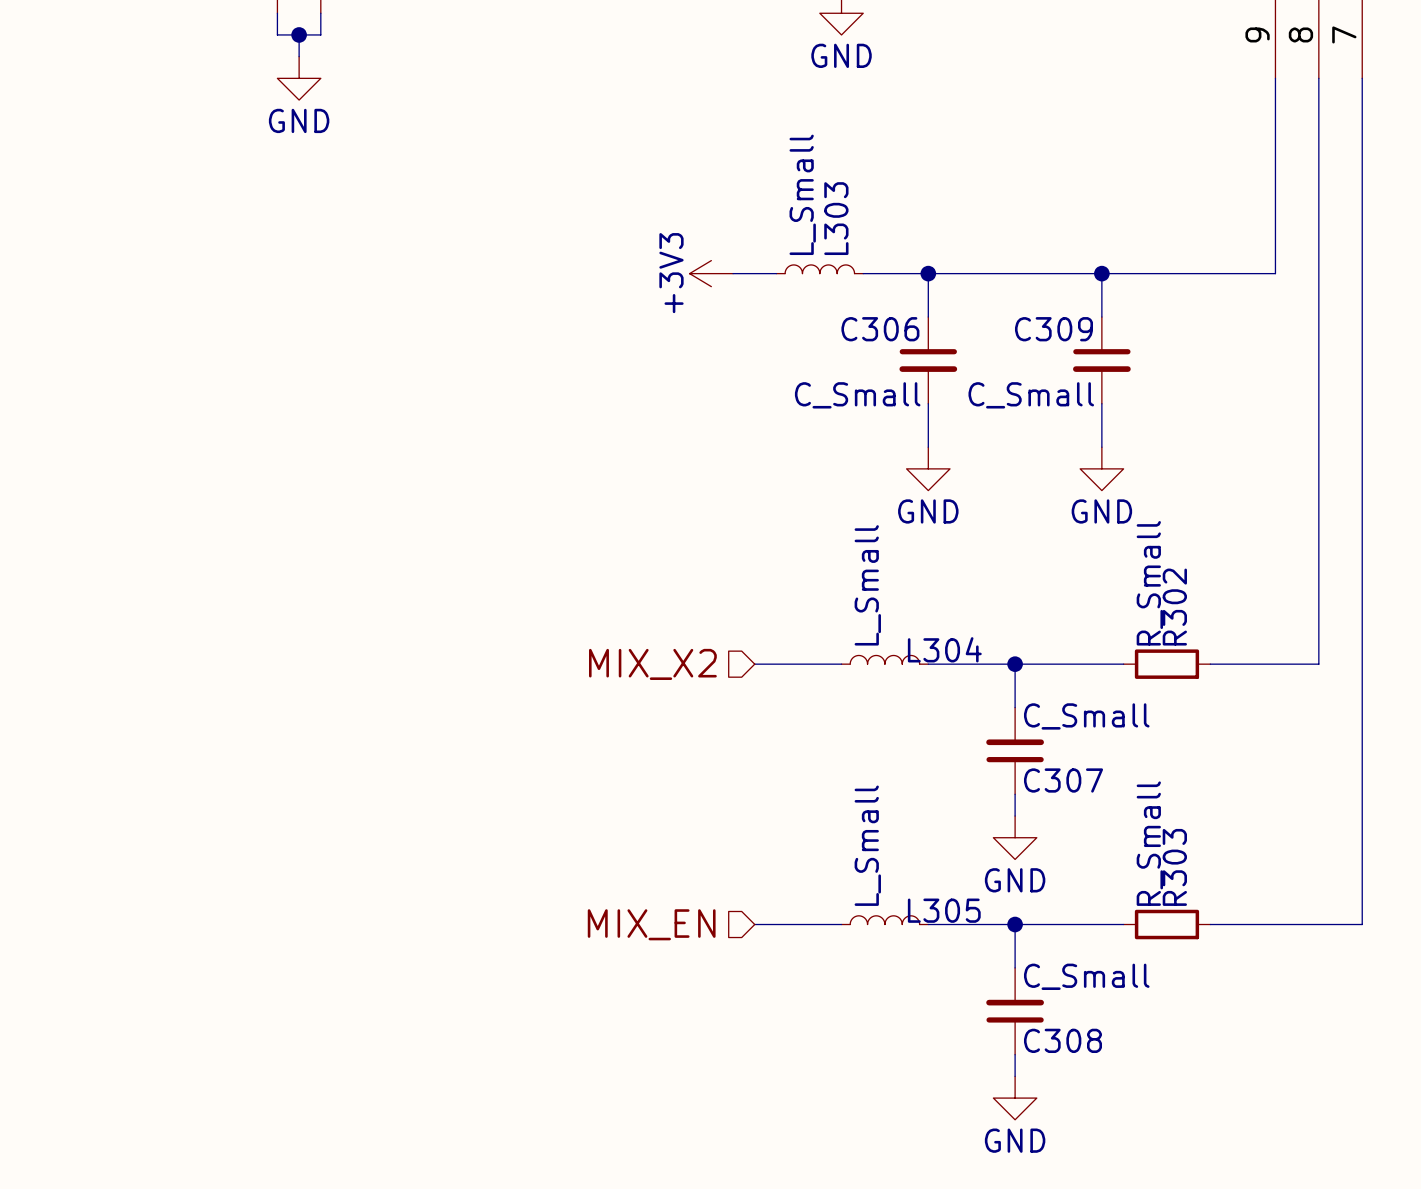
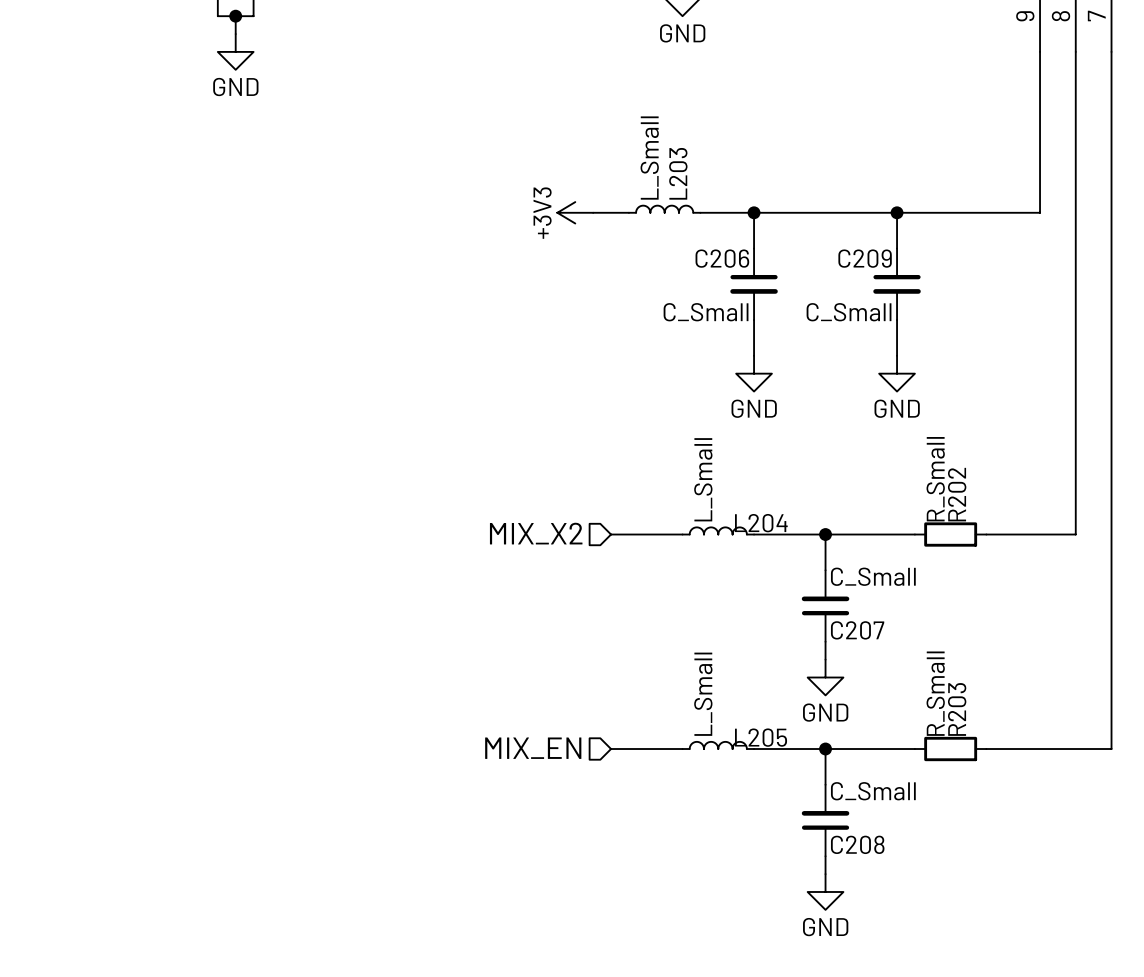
L303 name: L303 (836, 218) -> L203 (678, 173)
C306 name: C306 (880, 329) -> C206 (722, 258)
C309 name: C309 (1053, 329) -> C209 (865, 258)
R302 name: R302 (1174, 607) -> R202 (957, 494)
L304 name: L304 (944, 649) -> L204 (761, 523)
C307 name: C307 (1063, 780) -> C207 (857, 630)
R303 name: R303 (1174, 867) -> R203 (957, 709)
L305 name: L305 (944, 910) -> L205 (761, 737)
C308 name: C308 (1062, 1040) -> C208 (857, 844)

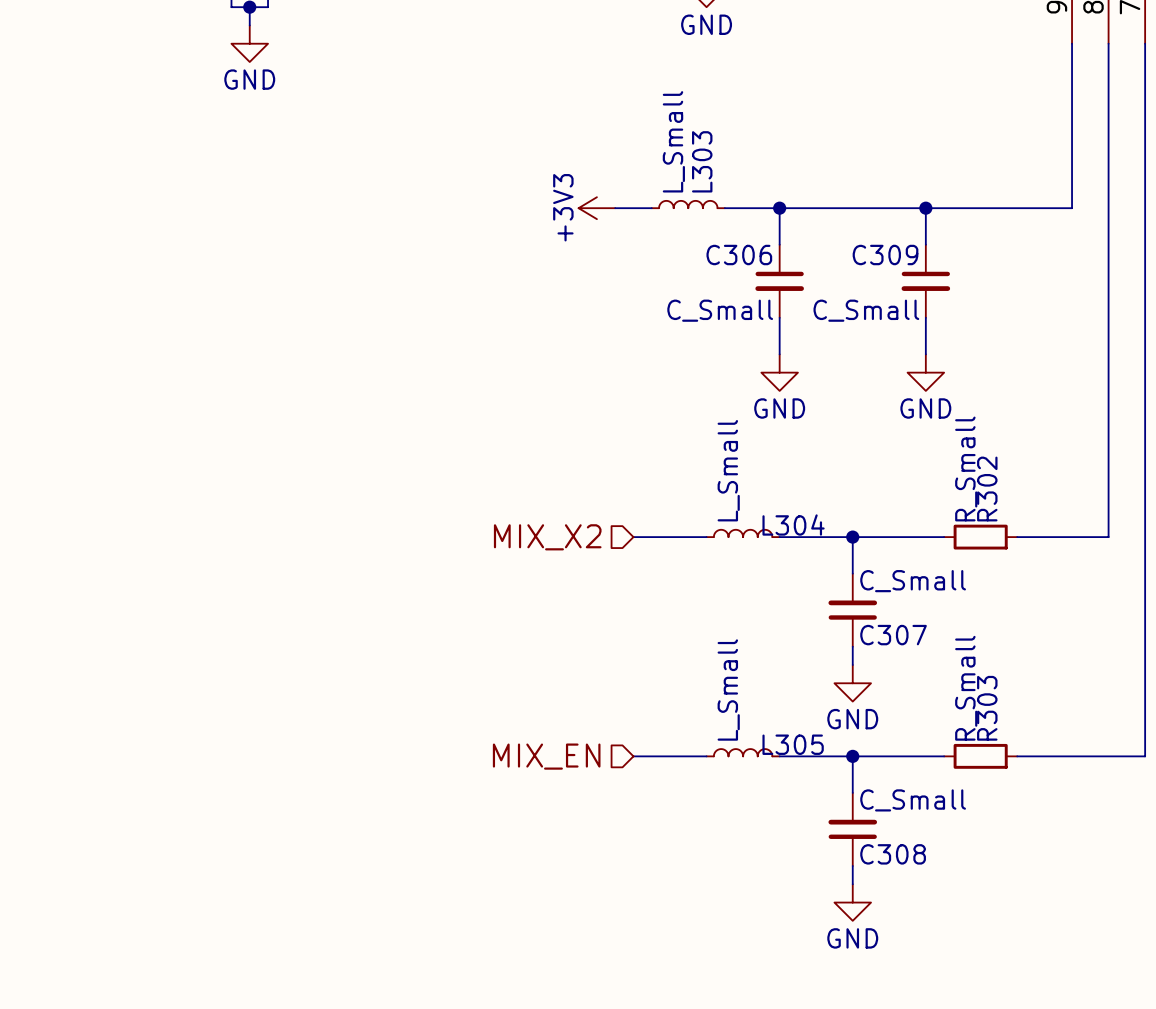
L203 name: L203 (678, 173) -> L303 (702, 161)
C206 name: C206 (722, 258) -> C306 (739, 255)
C209 name: C209 (865, 258) -> C309 (885, 255)
R202 name: R202 (957, 494) -> R302 (987, 489)
L204 name: L204 (761, 523) -> L304 (793, 525)
C207 name: C207 (857, 630) -> C307 (893, 635)
R203 name: R203 (957, 709) -> R303 (987, 708)
L205 name: L205 (761, 737) -> L305 (793, 744)
C208 name: C208 (857, 844) -> C308 (893, 854)

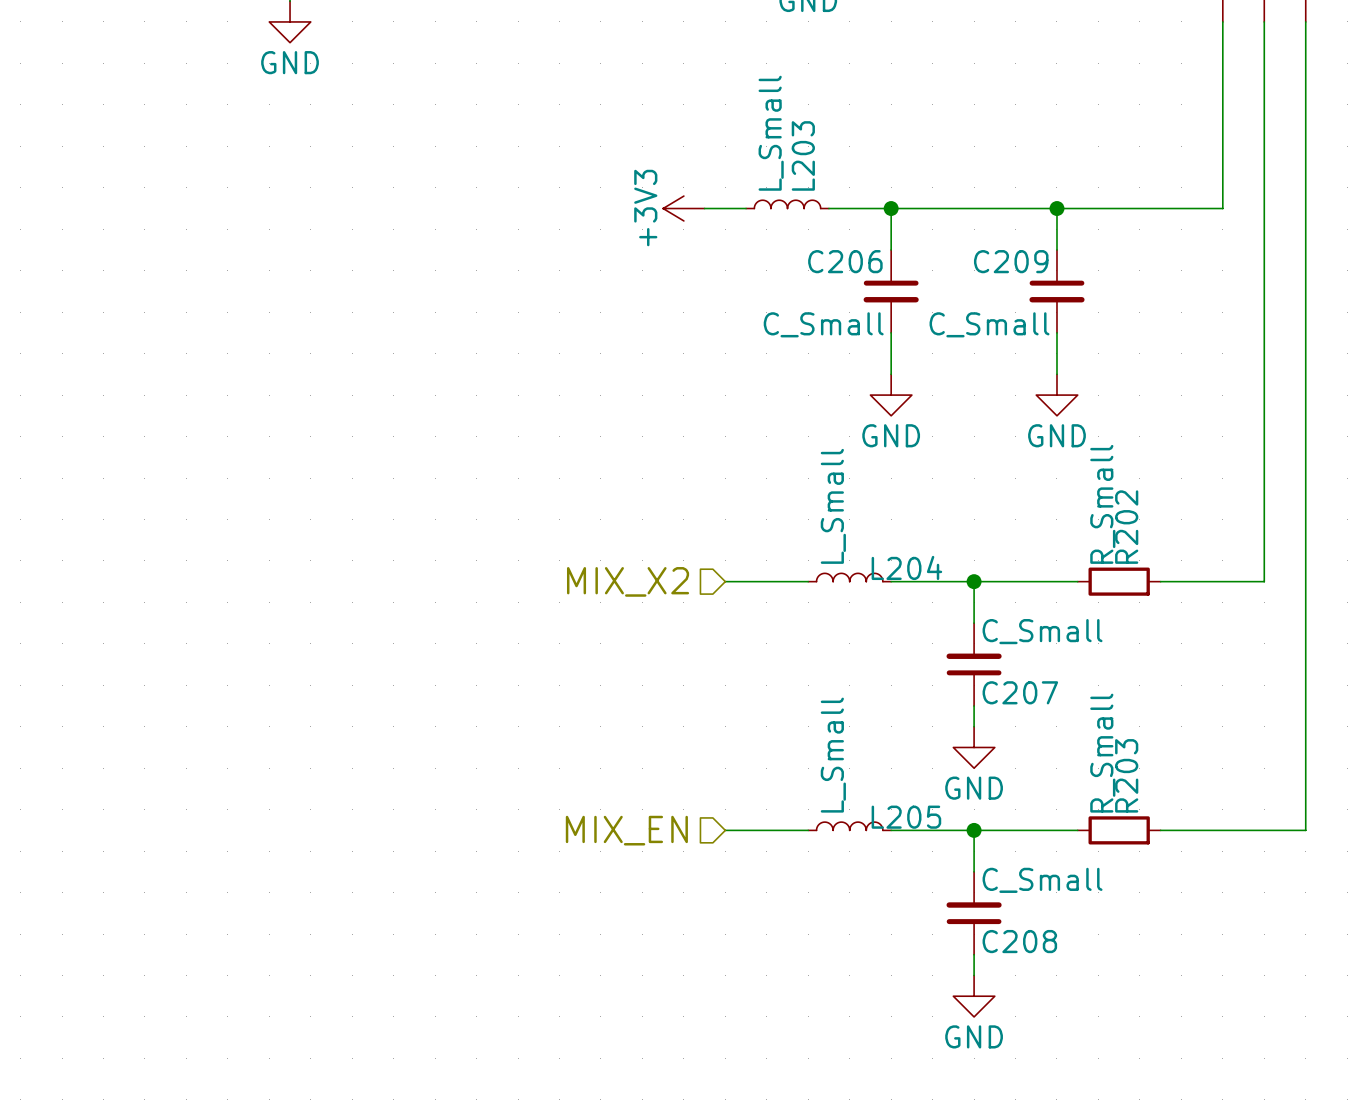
L303 name: L303 (702, 161) -> L203 (803, 155)
C306 name: C306 (739, 255) -> C206 (845, 261)
C309 name: C309 (885, 255) -> C209 (1011, 261)
R302 name: R302 (987, 489) -> R202 (1126, 527)
L304 name: L304 (793, 525) -> L204 (906, 567)
C307 name: C307 (893, 635) -> C207 (1020, 692)
R303 name: R303 (987, 708) -> R203 (1126, 775)
L305 name: L305 (793, 744) -> L205 (906, 817)
C308 name: C308 (893, 854) -> C208 (1019, 941)

